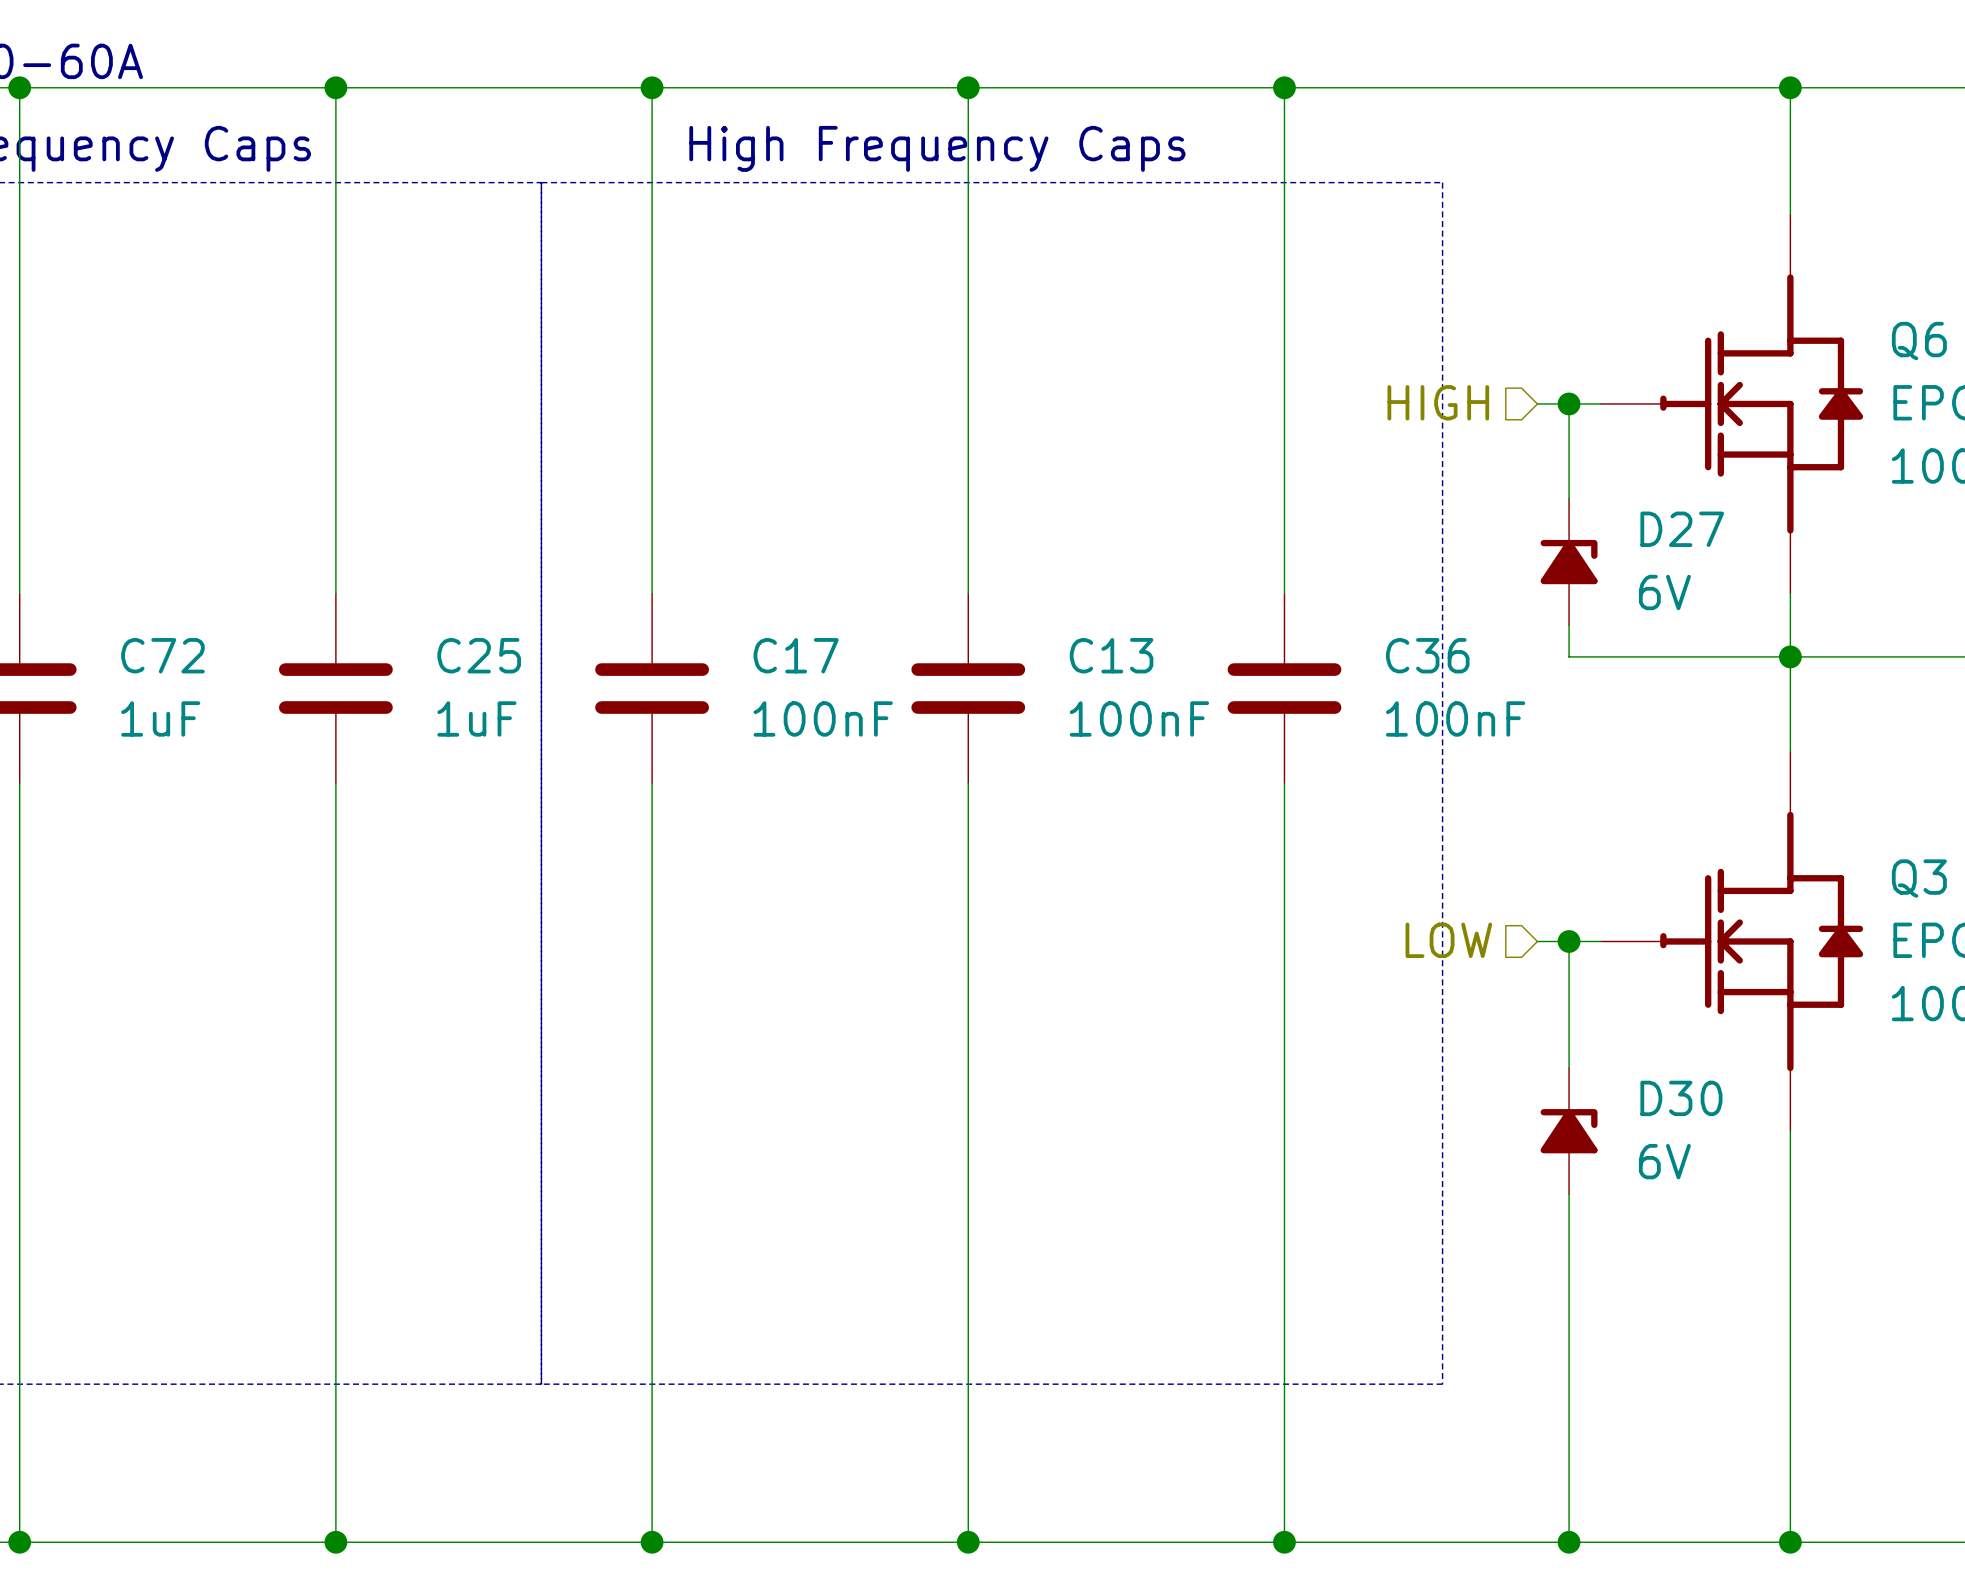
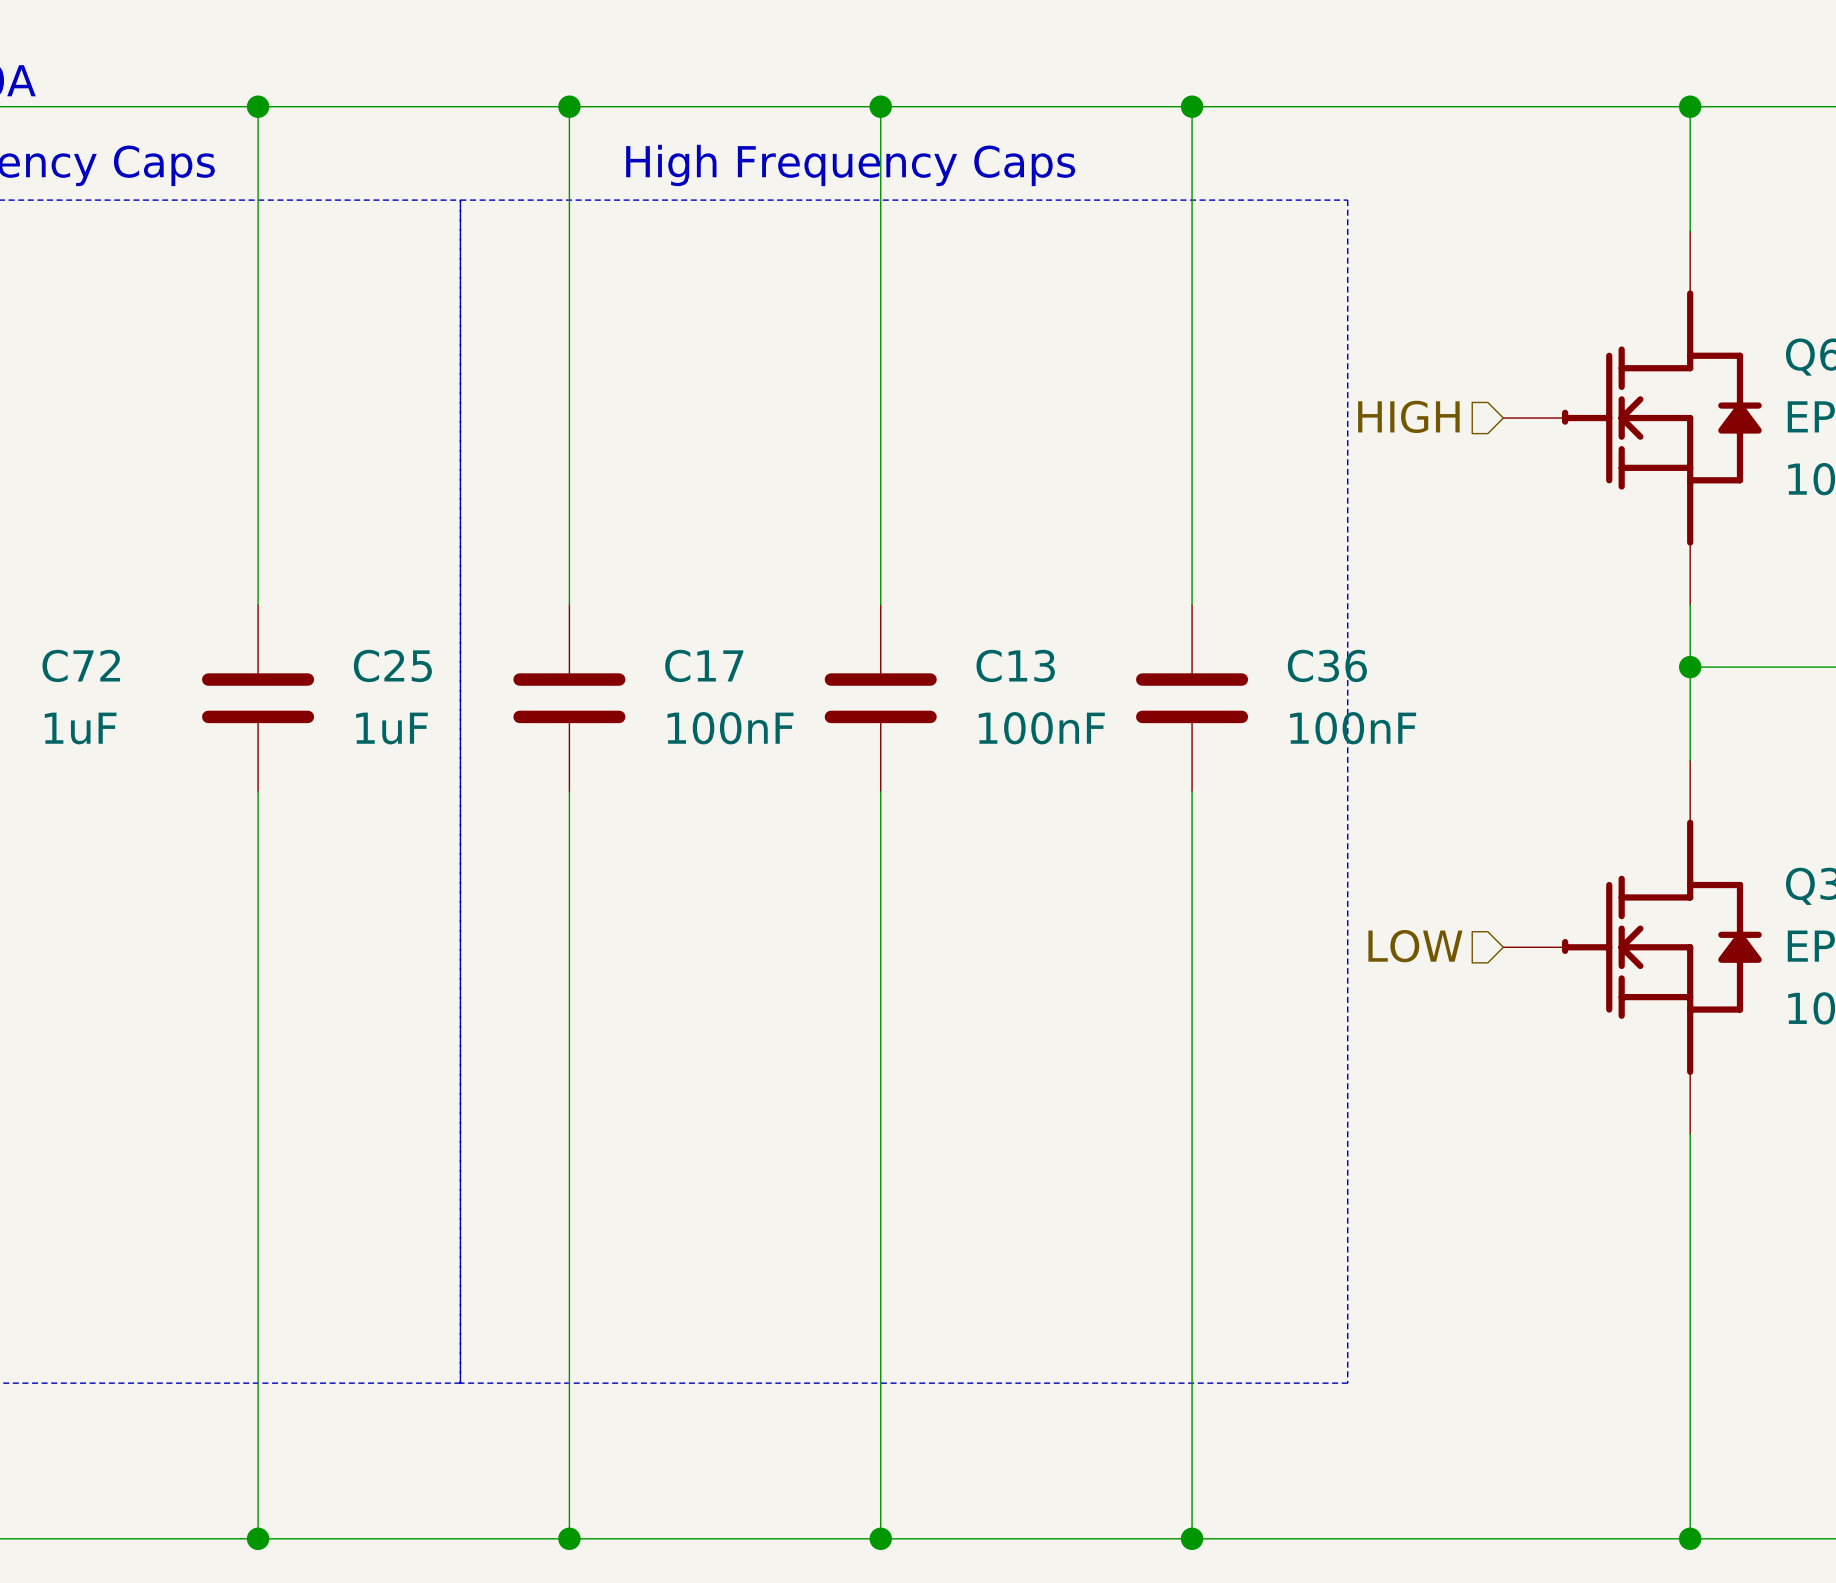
hierarchical label position: HIGH (1438, 402) -> HIGH (1408, 416)
wire: (1537, 403) (1600, 403) -> none
wire: (1569, 403) (1569, 498) -> none
junction: (1569, 403) -> none
D27: 6V (1569, 562) -> none
wire: (1569, 625) (1569, 656) (1790, 656) -> none
hierarchical label position: LOW (1448, 940) -> LOW (1415, 946)
wire: (1537, 941) (1600, 941) -> none
wire: (1569, 941) (1569, 1067) -> none
junction: (1569, 941) -> none
D30: 6V (1569, 1131) -> none
wire: (1569, 1194) (1569, 1542) -> none
junction: (1569, 1542) -> none

